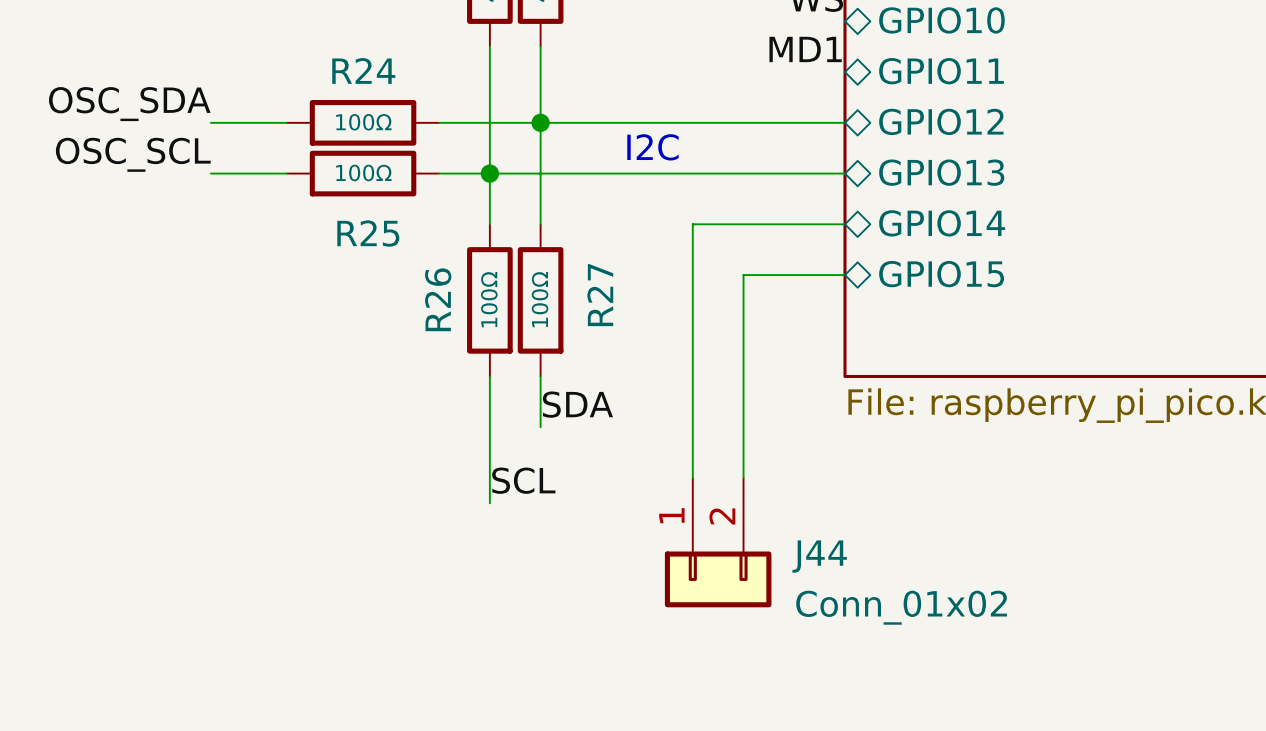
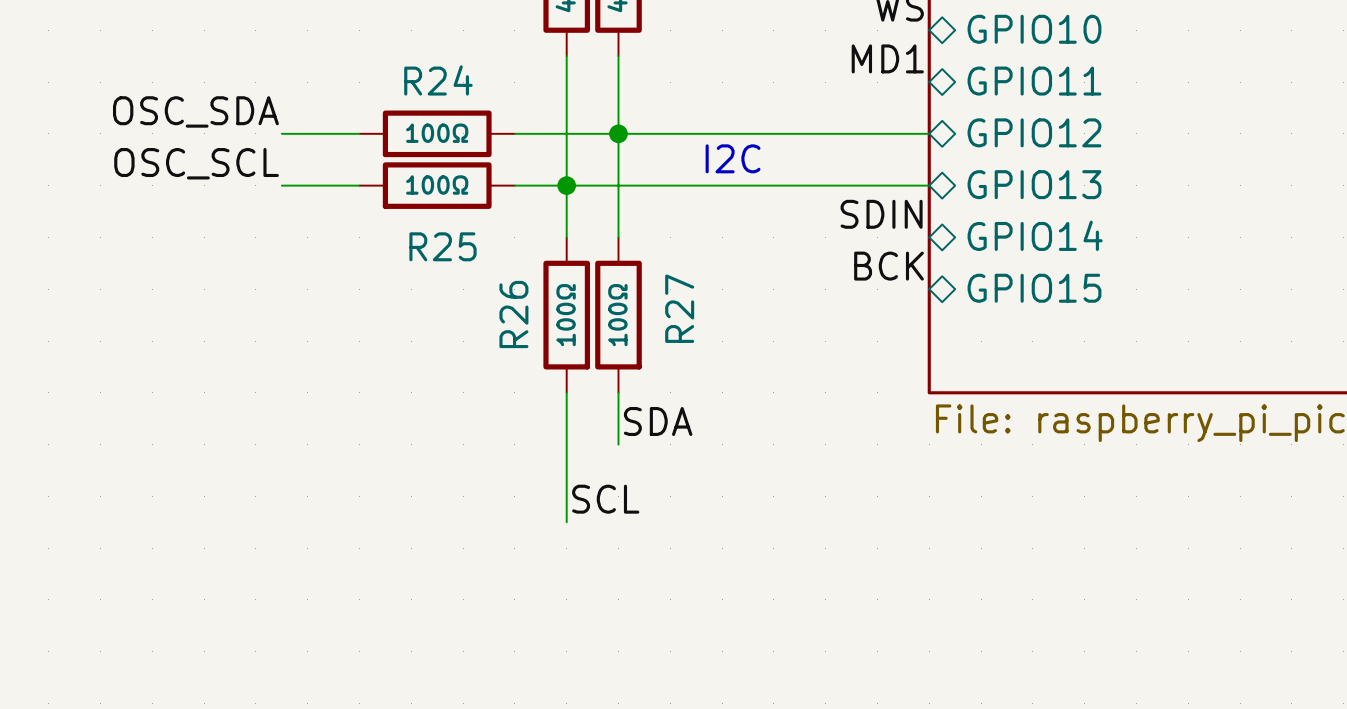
label: none -> SDIN (881, 214)
wire: (844, 224) (692, 224) (692, 477) -> none
label: none -> BCK (888, 266)
wire: (844, 275) (743, 275) (743, 477) -> none
J44: Conn_01x02 (718, 542) -> none

